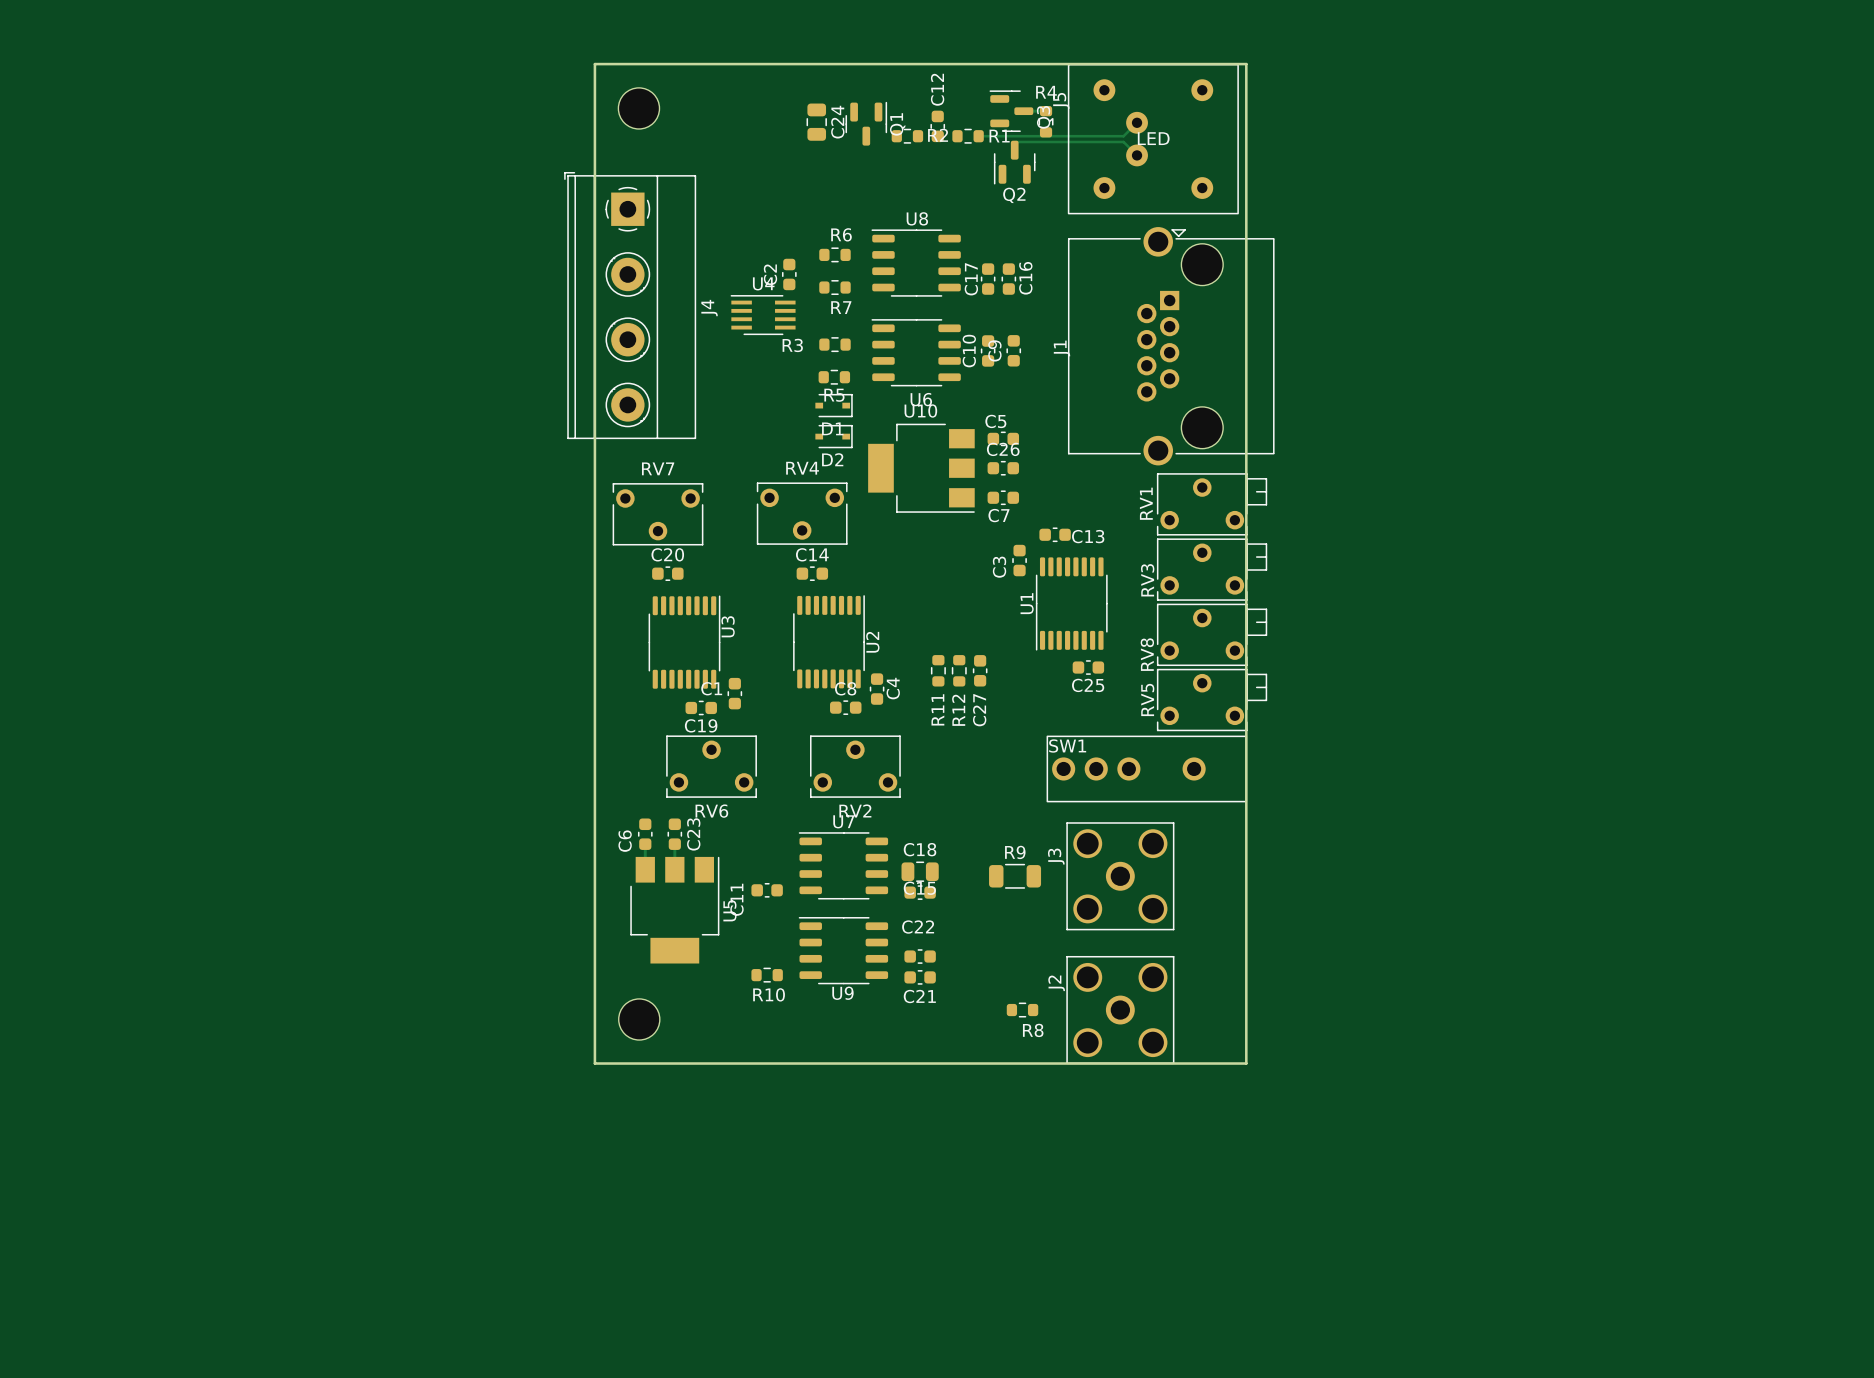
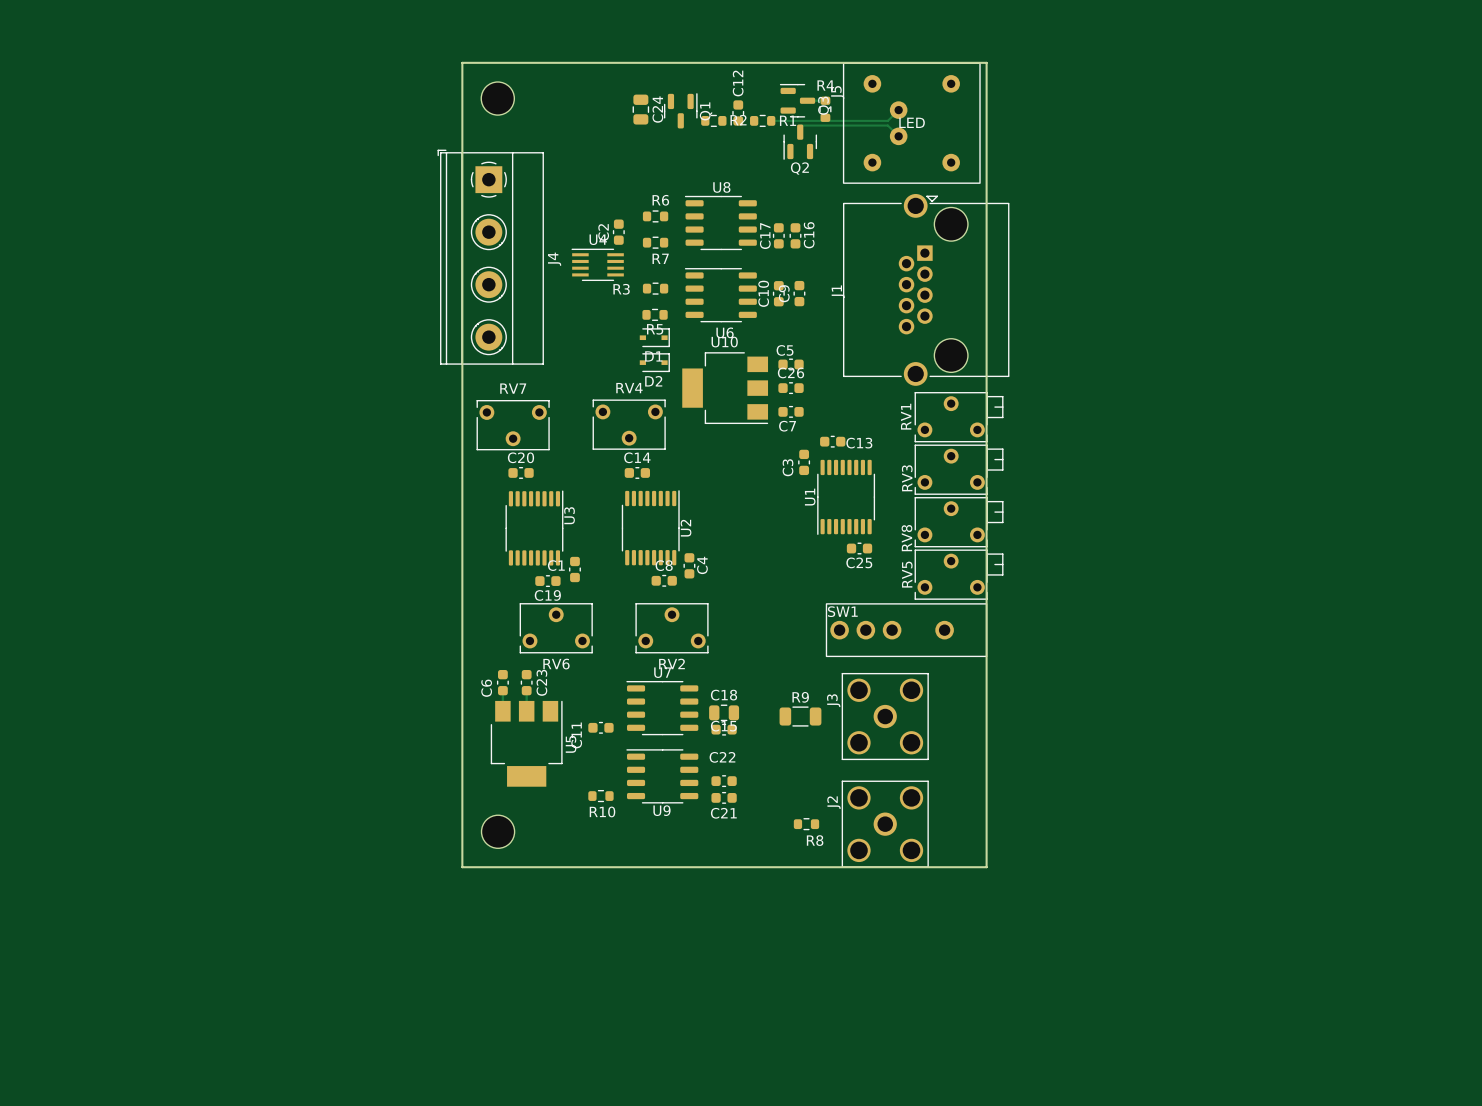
R11: (938, 670) -> none
R12: (959, 670) -> none
C27: (980, 670) -> none

